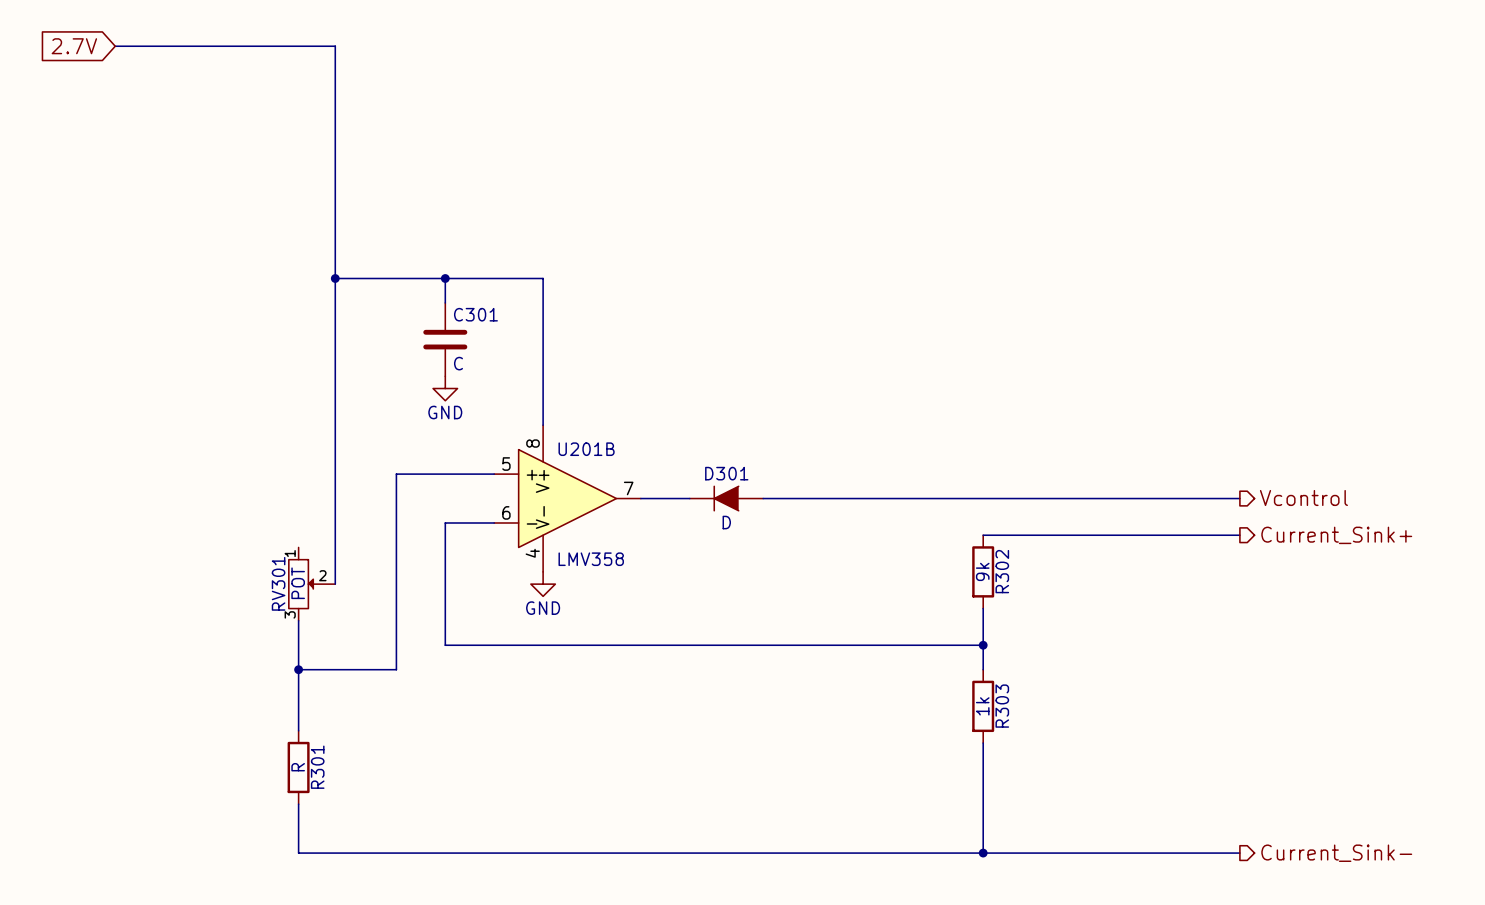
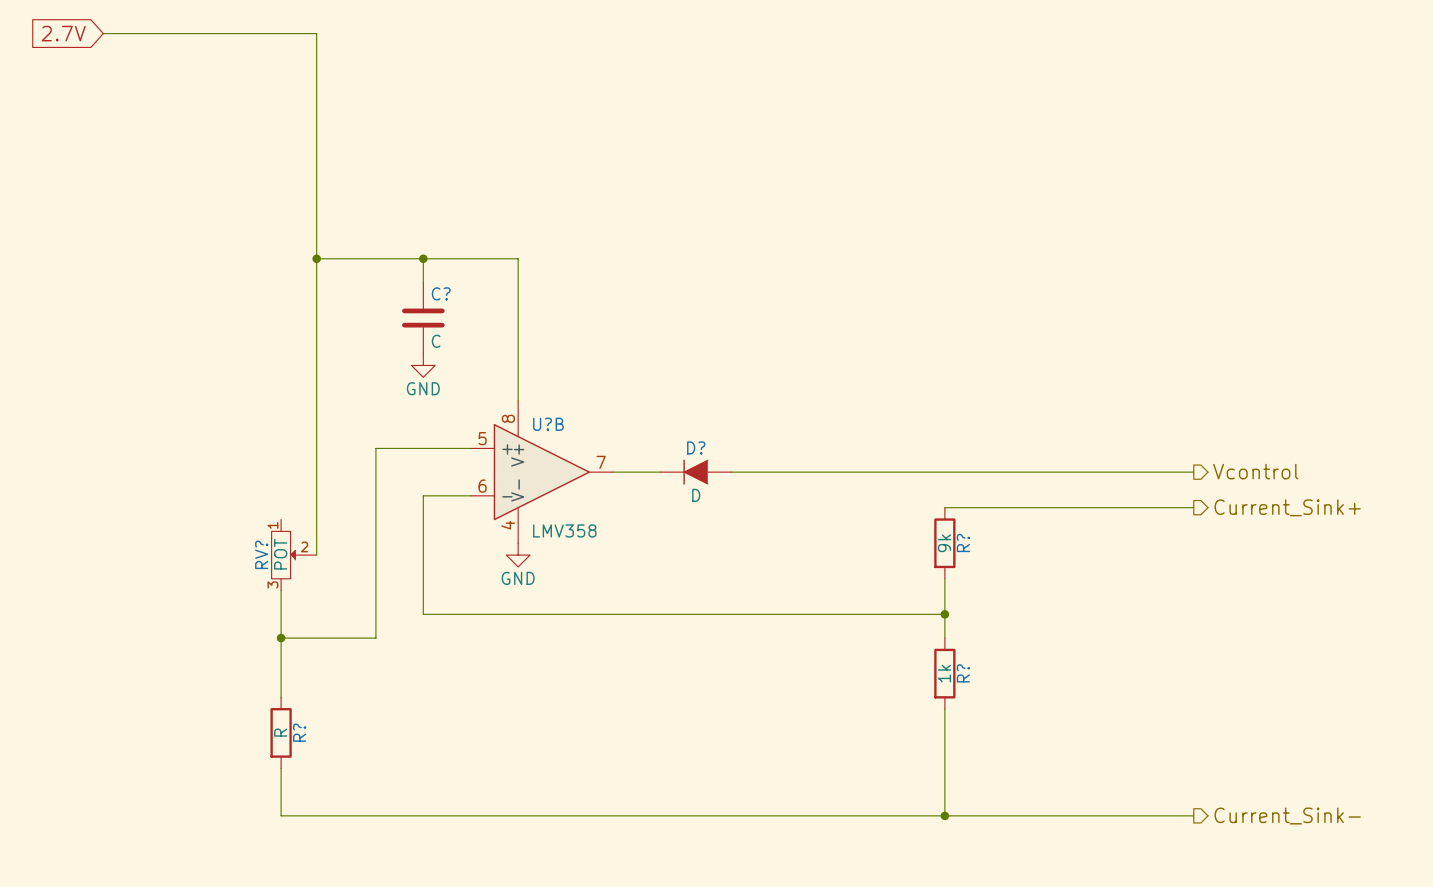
C301 name: C301 (475, 314) -> C? (441, 293)
U201B name: U201B (586, 449) -> U?B (548, 424)
D301 name: D301 (726, 473) -> D? (696, 447)
R302 name: R302 (1002, 571) -> R? (963, 542)
RV301 name: RV301 (278, 583) -> RV? (261, 554)
R303 name: R303 (1002, 706) -> R? (963, 673)
R301 name: R301 (317, 767) -> R? (299, 732)

